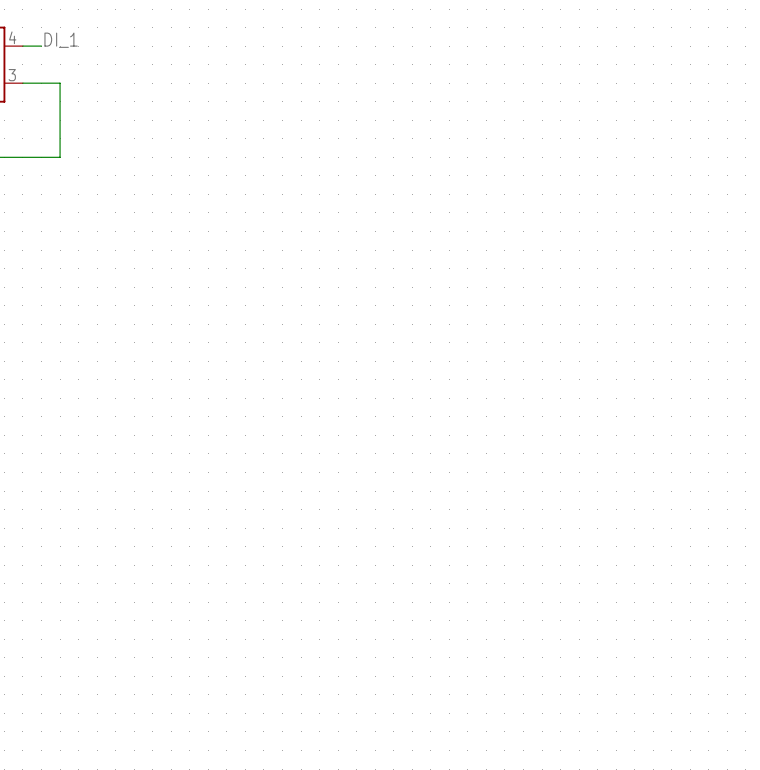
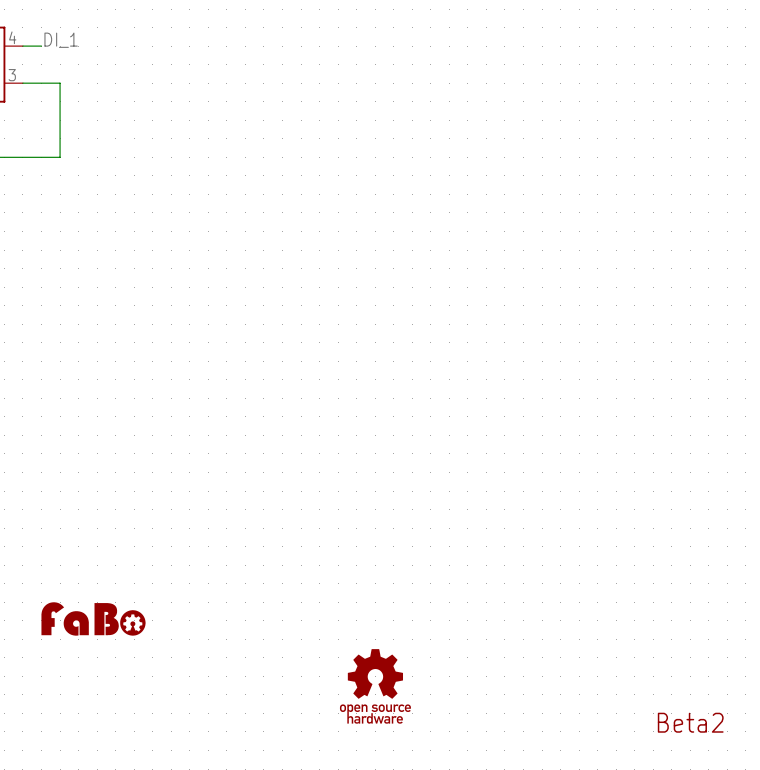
part: none -> (93, 618)
part: none -> (375, 686)
text: none -> Beta2 (690, 722)

